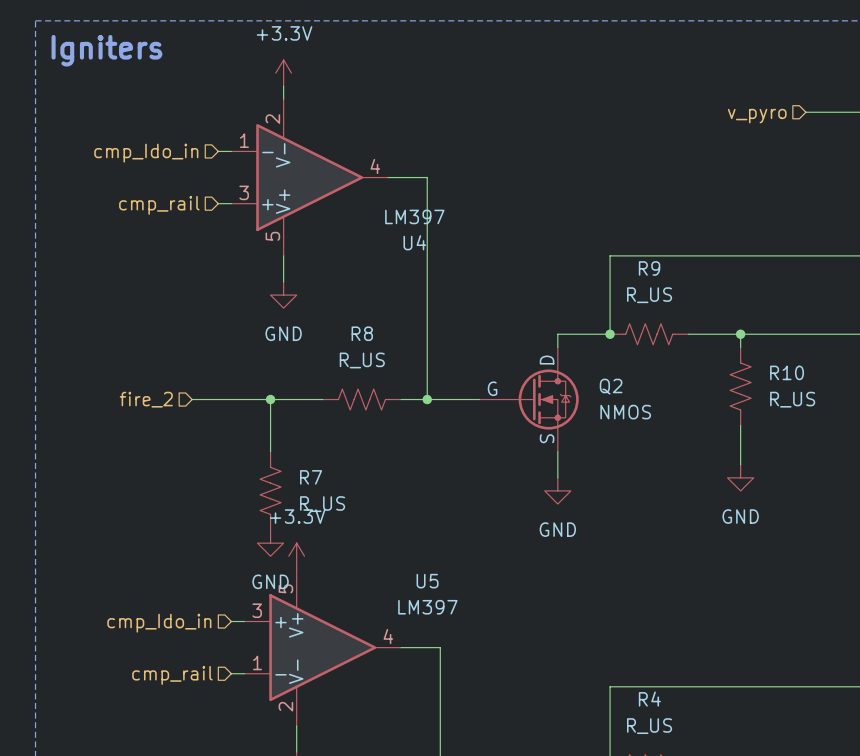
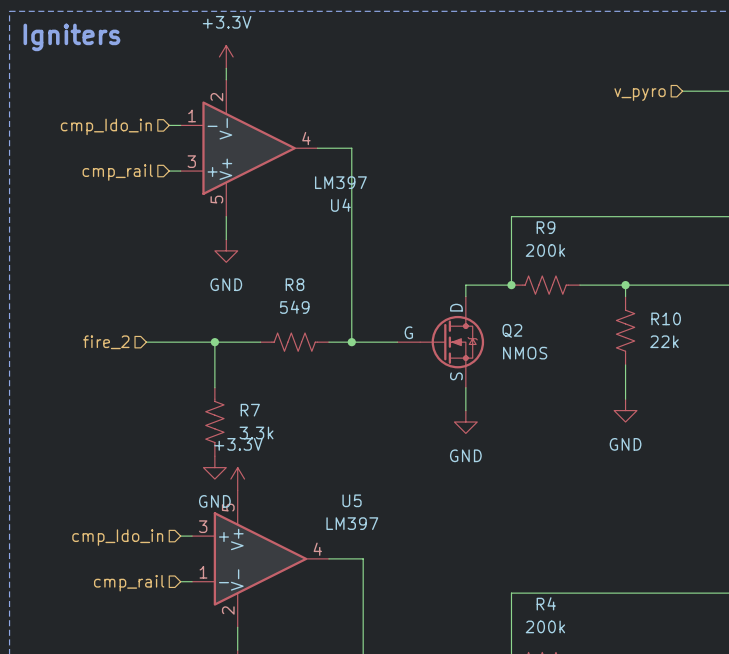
R9 value: R_US (649, 295) -> 200k (545, 250)
R8 value: R_US (362, 360) -> 549 (294, 307)
R10 value: R_US (792, 399) -> 22k (664, 341)
R7 value: R_US (322, 504) -> 3.3k (256, 432)
R4 value: R_US (649, 726) -> 200k (545, 626)

